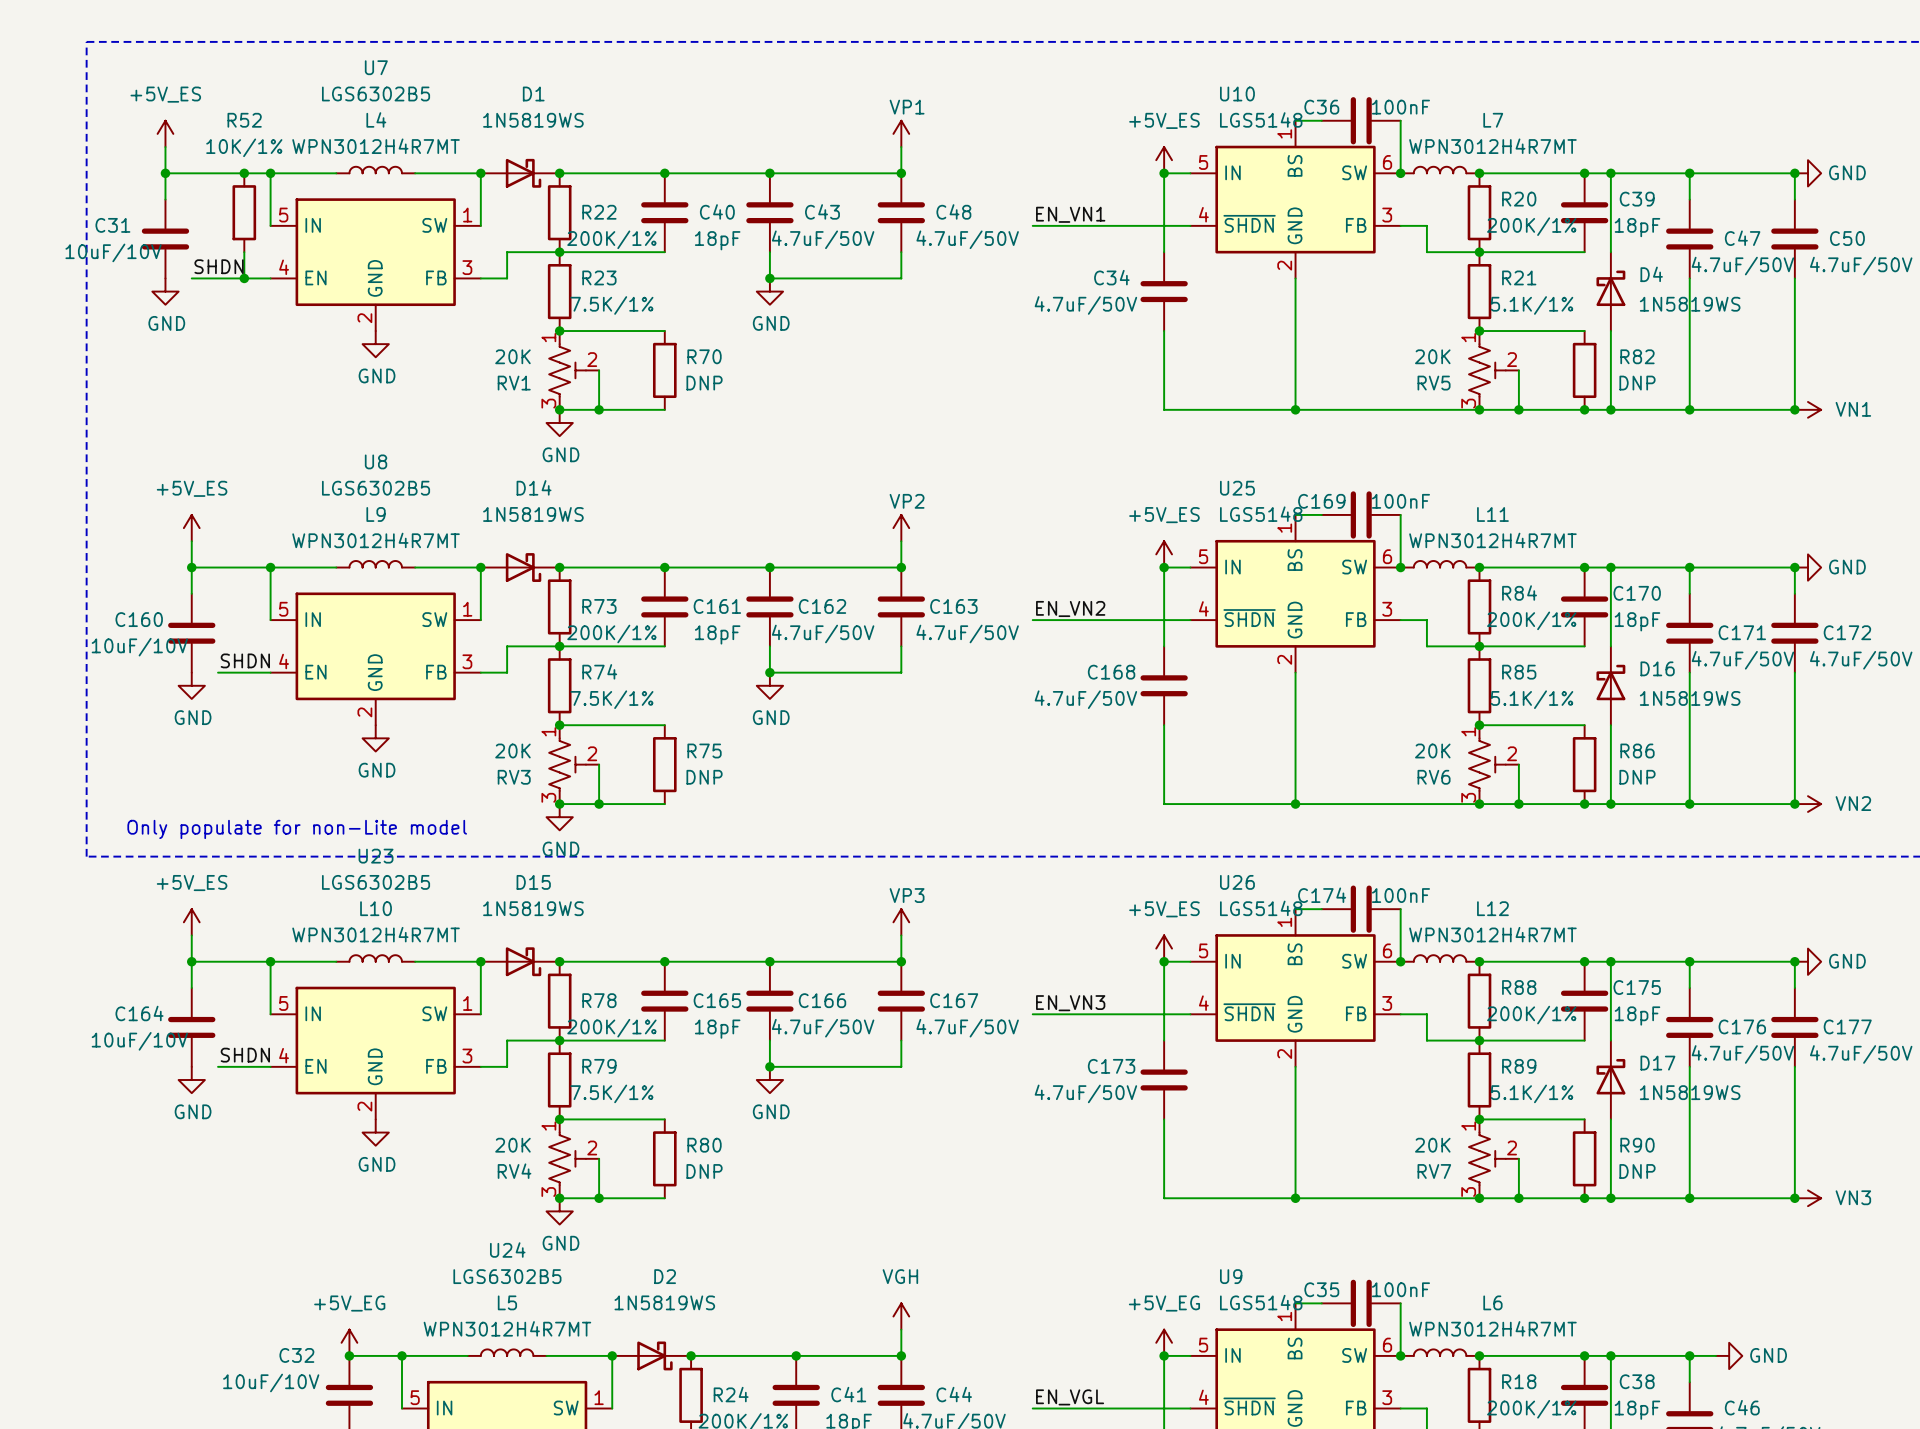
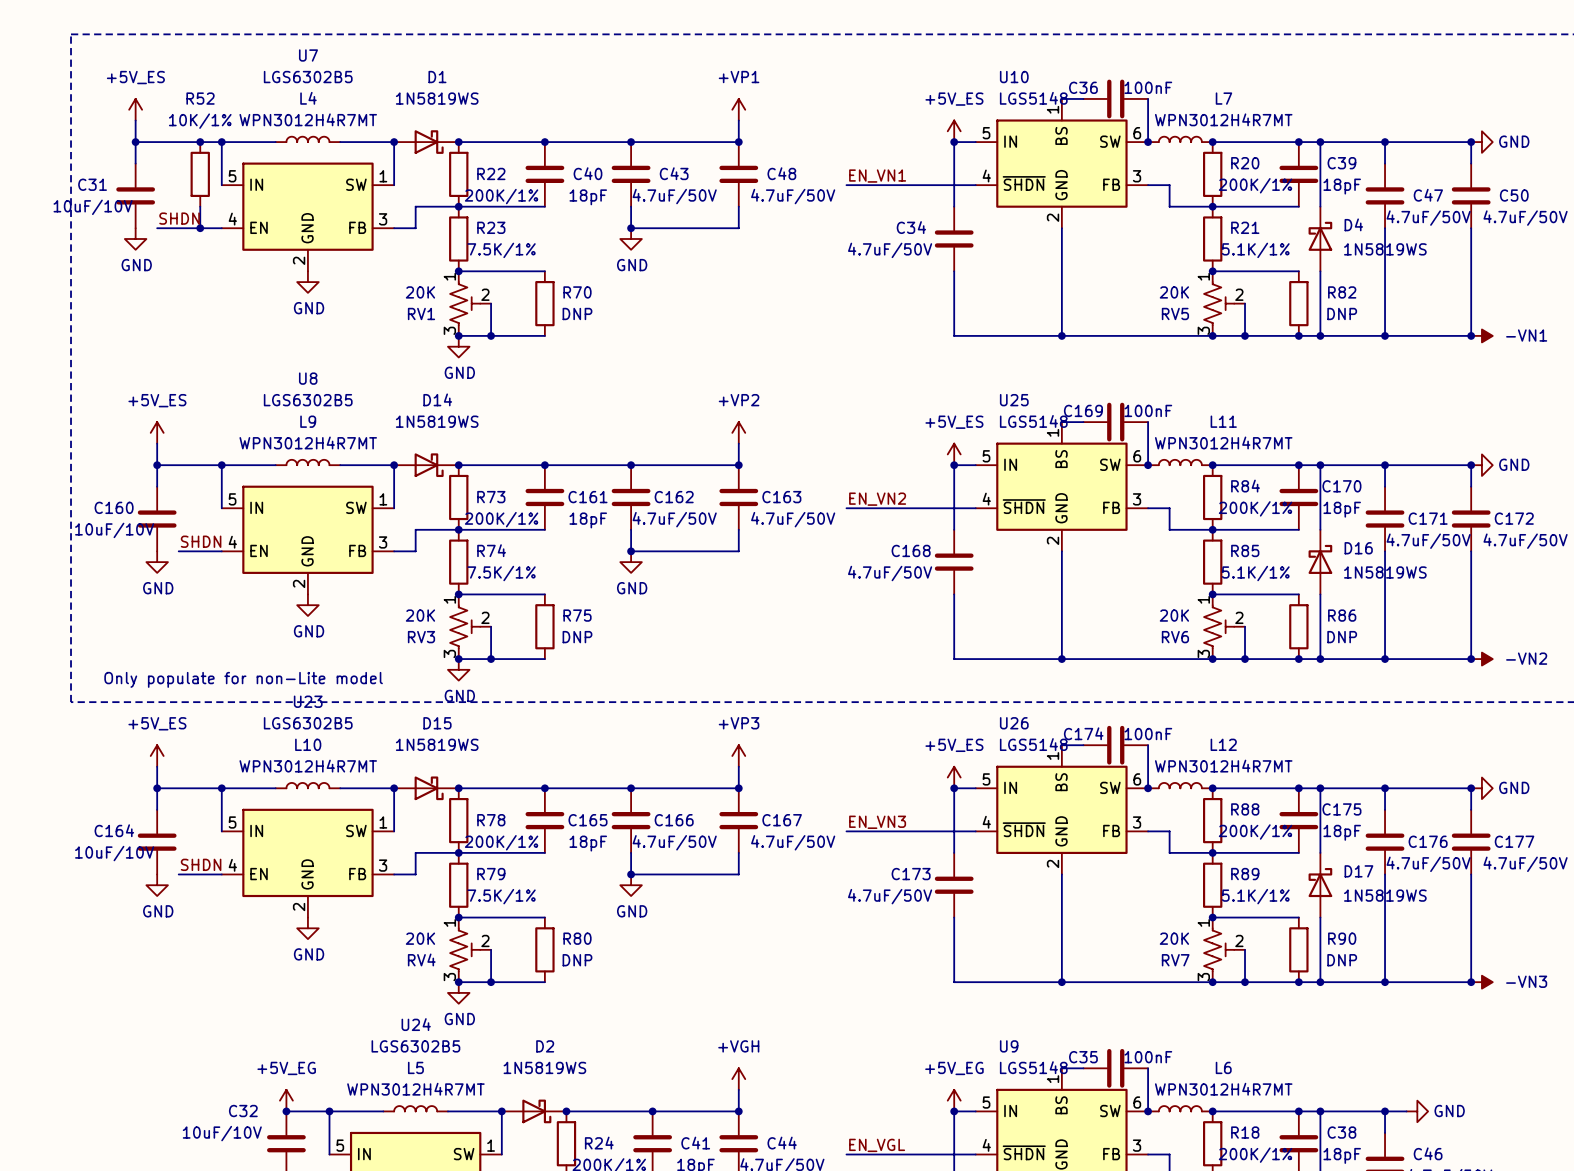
power symbol: VP1 (901, 133) -> +VP1 (738, 109)
power symbol: VN1 (1808, 409) -> -VN1 (1481, 335)
power symbol: VP2 (901, 528) -> +VP2 (738, 432)
power symbol: VN2 (1808, 804) -> -VN2 (1481, 659)
power symbol: VP3 (901, 922) -> +VP3 (738, 755)
power symbol: VN3 (1808, 1198) -> -VN3 (1481, 982)
power symbol: VGH (901, 1316) -> +VGH (738, 1079)

